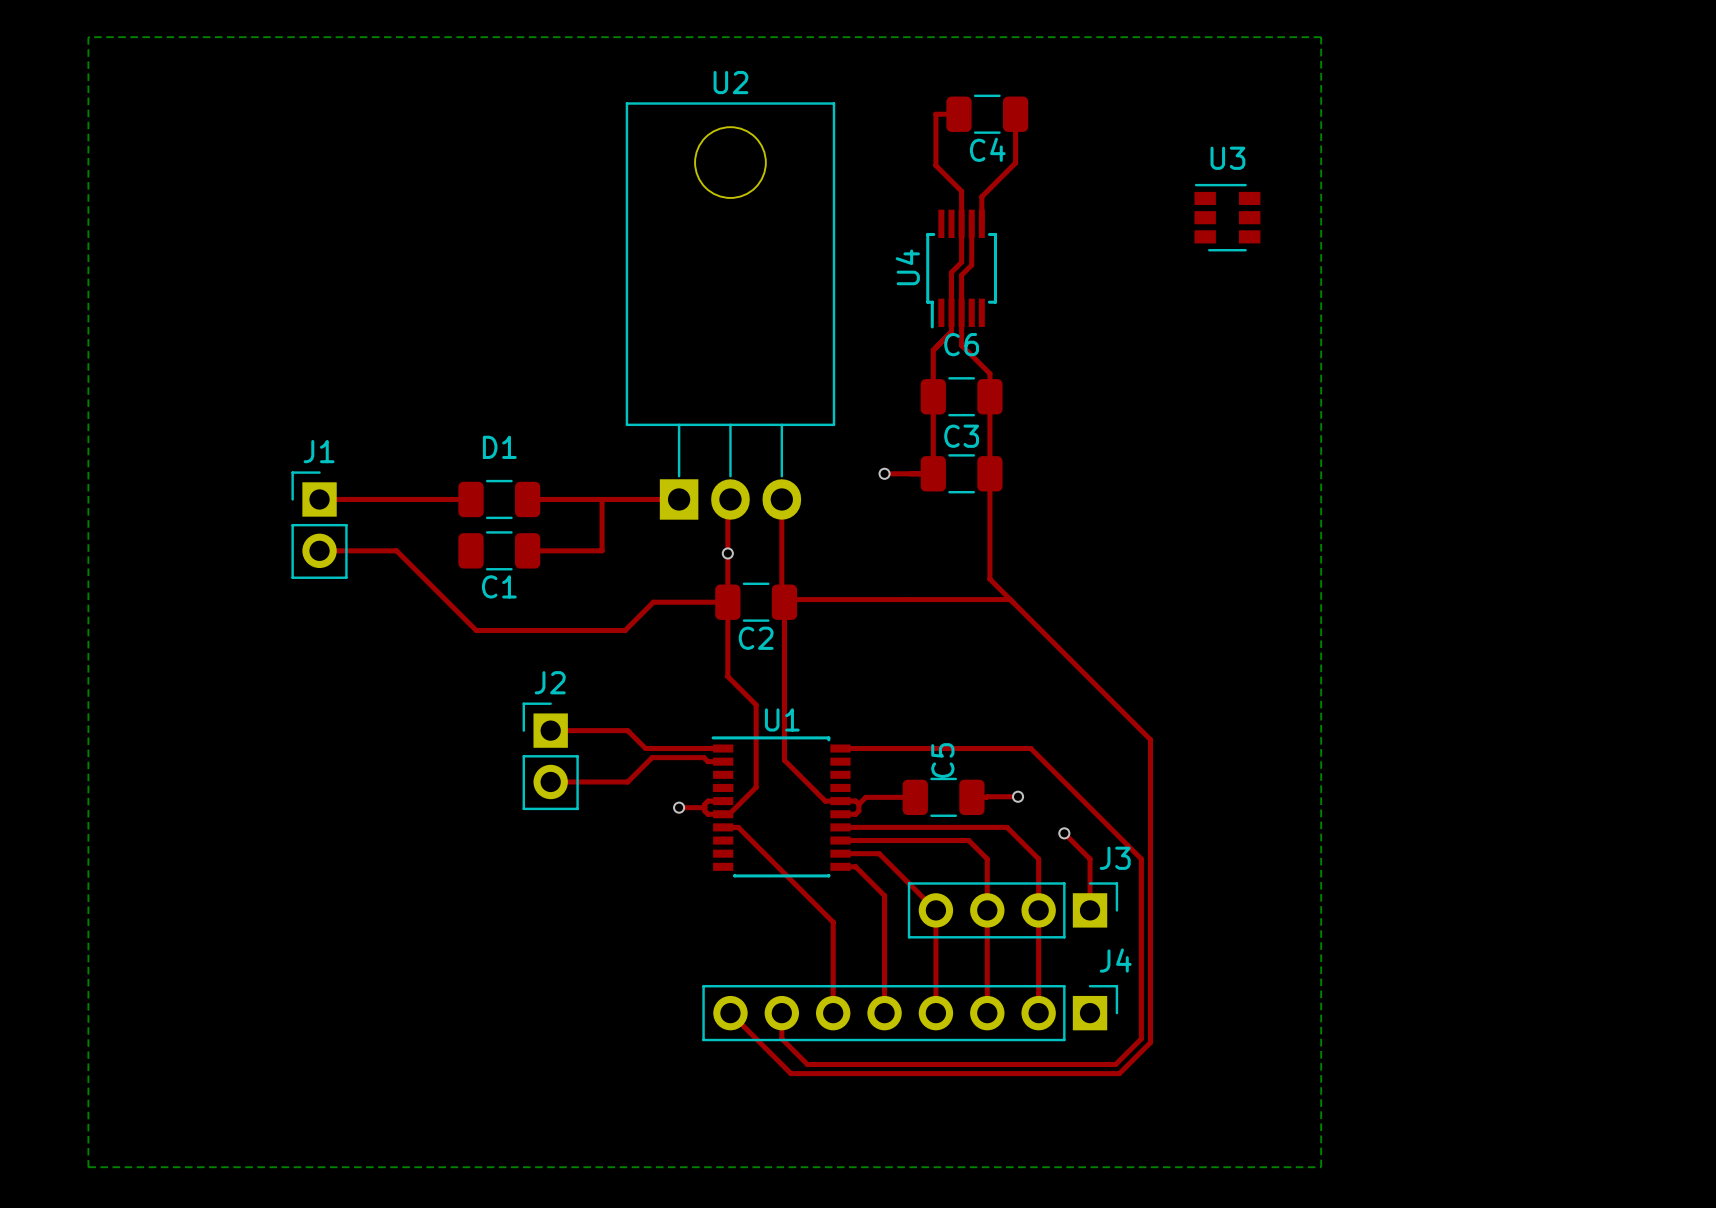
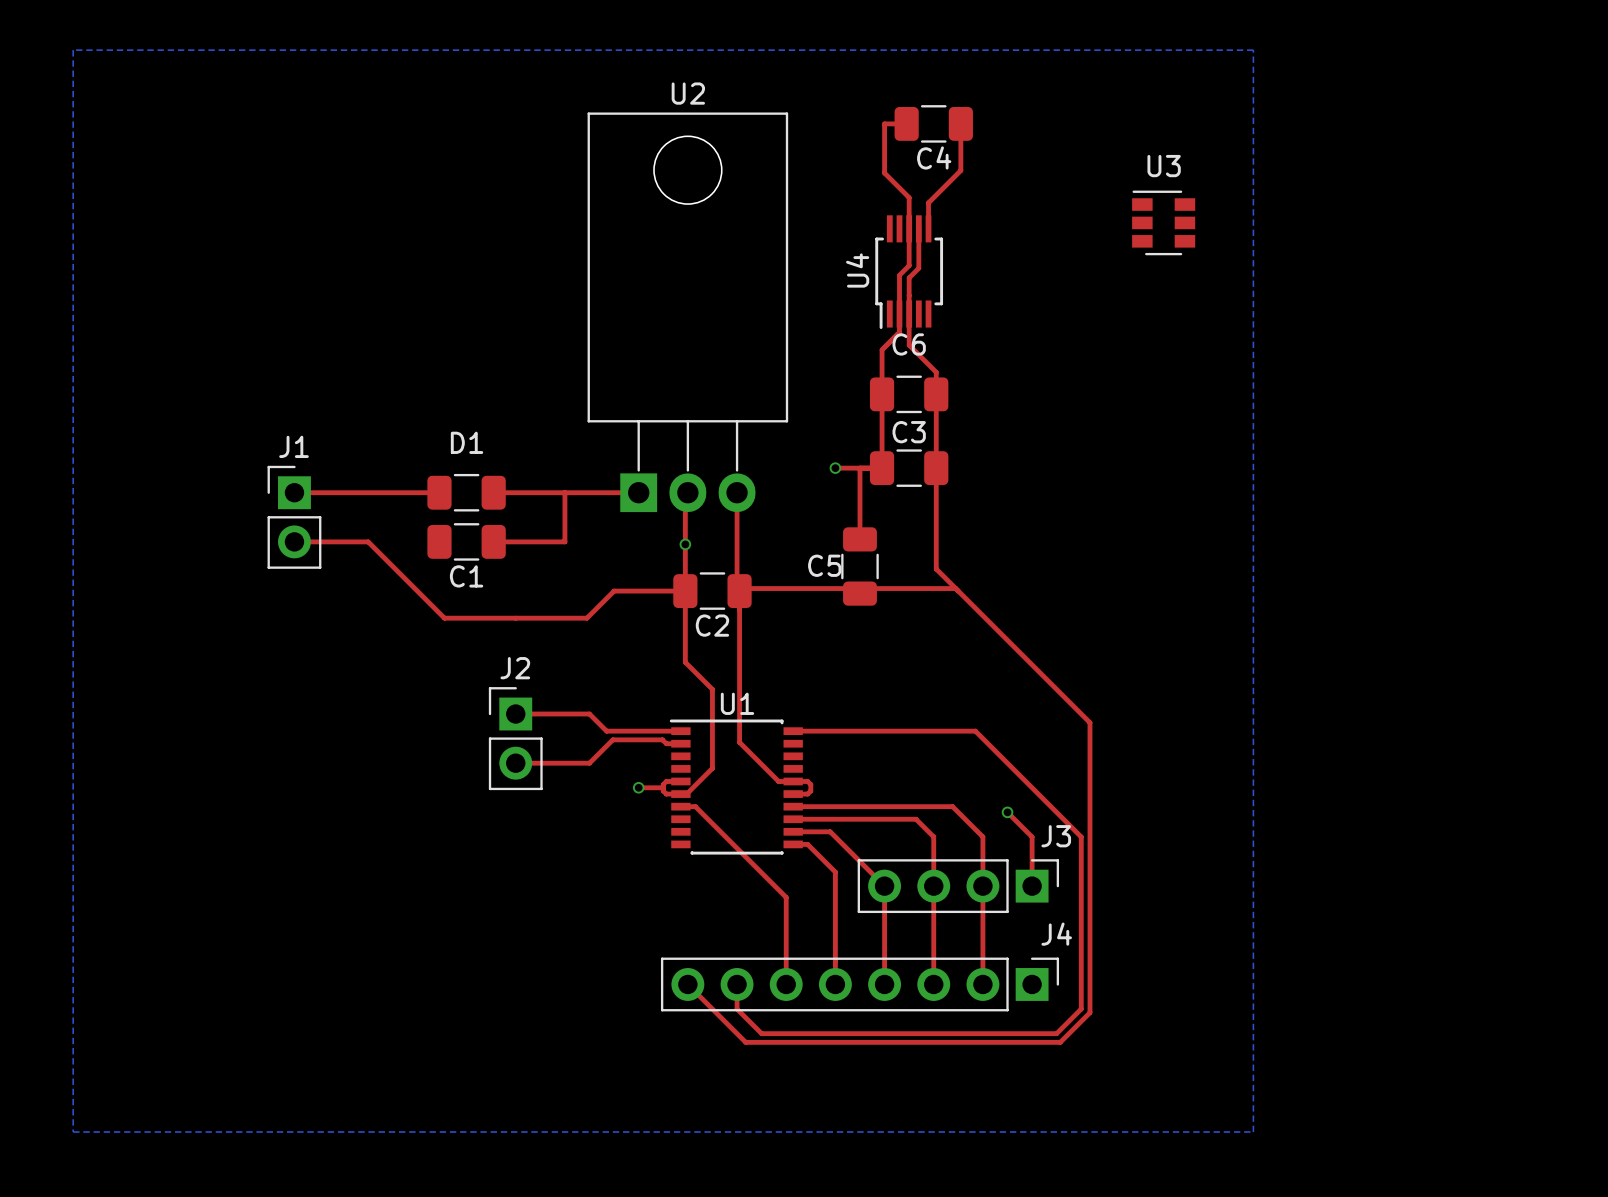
top track: none -> (859, 468) (859, 539)
C5 name position: C5 (942, 760) -> C5 (824, 565)
top track: (1018, 796) (971, 797) -> none
via: (1018, 796) -> none
top track: (915, 797) (865, 797) (858, 804) -> none
C5 rotation: 0° (943, 797) -> 90° clockwise (859, 566)
C5 position: (943, 797) -> (859, 566)

